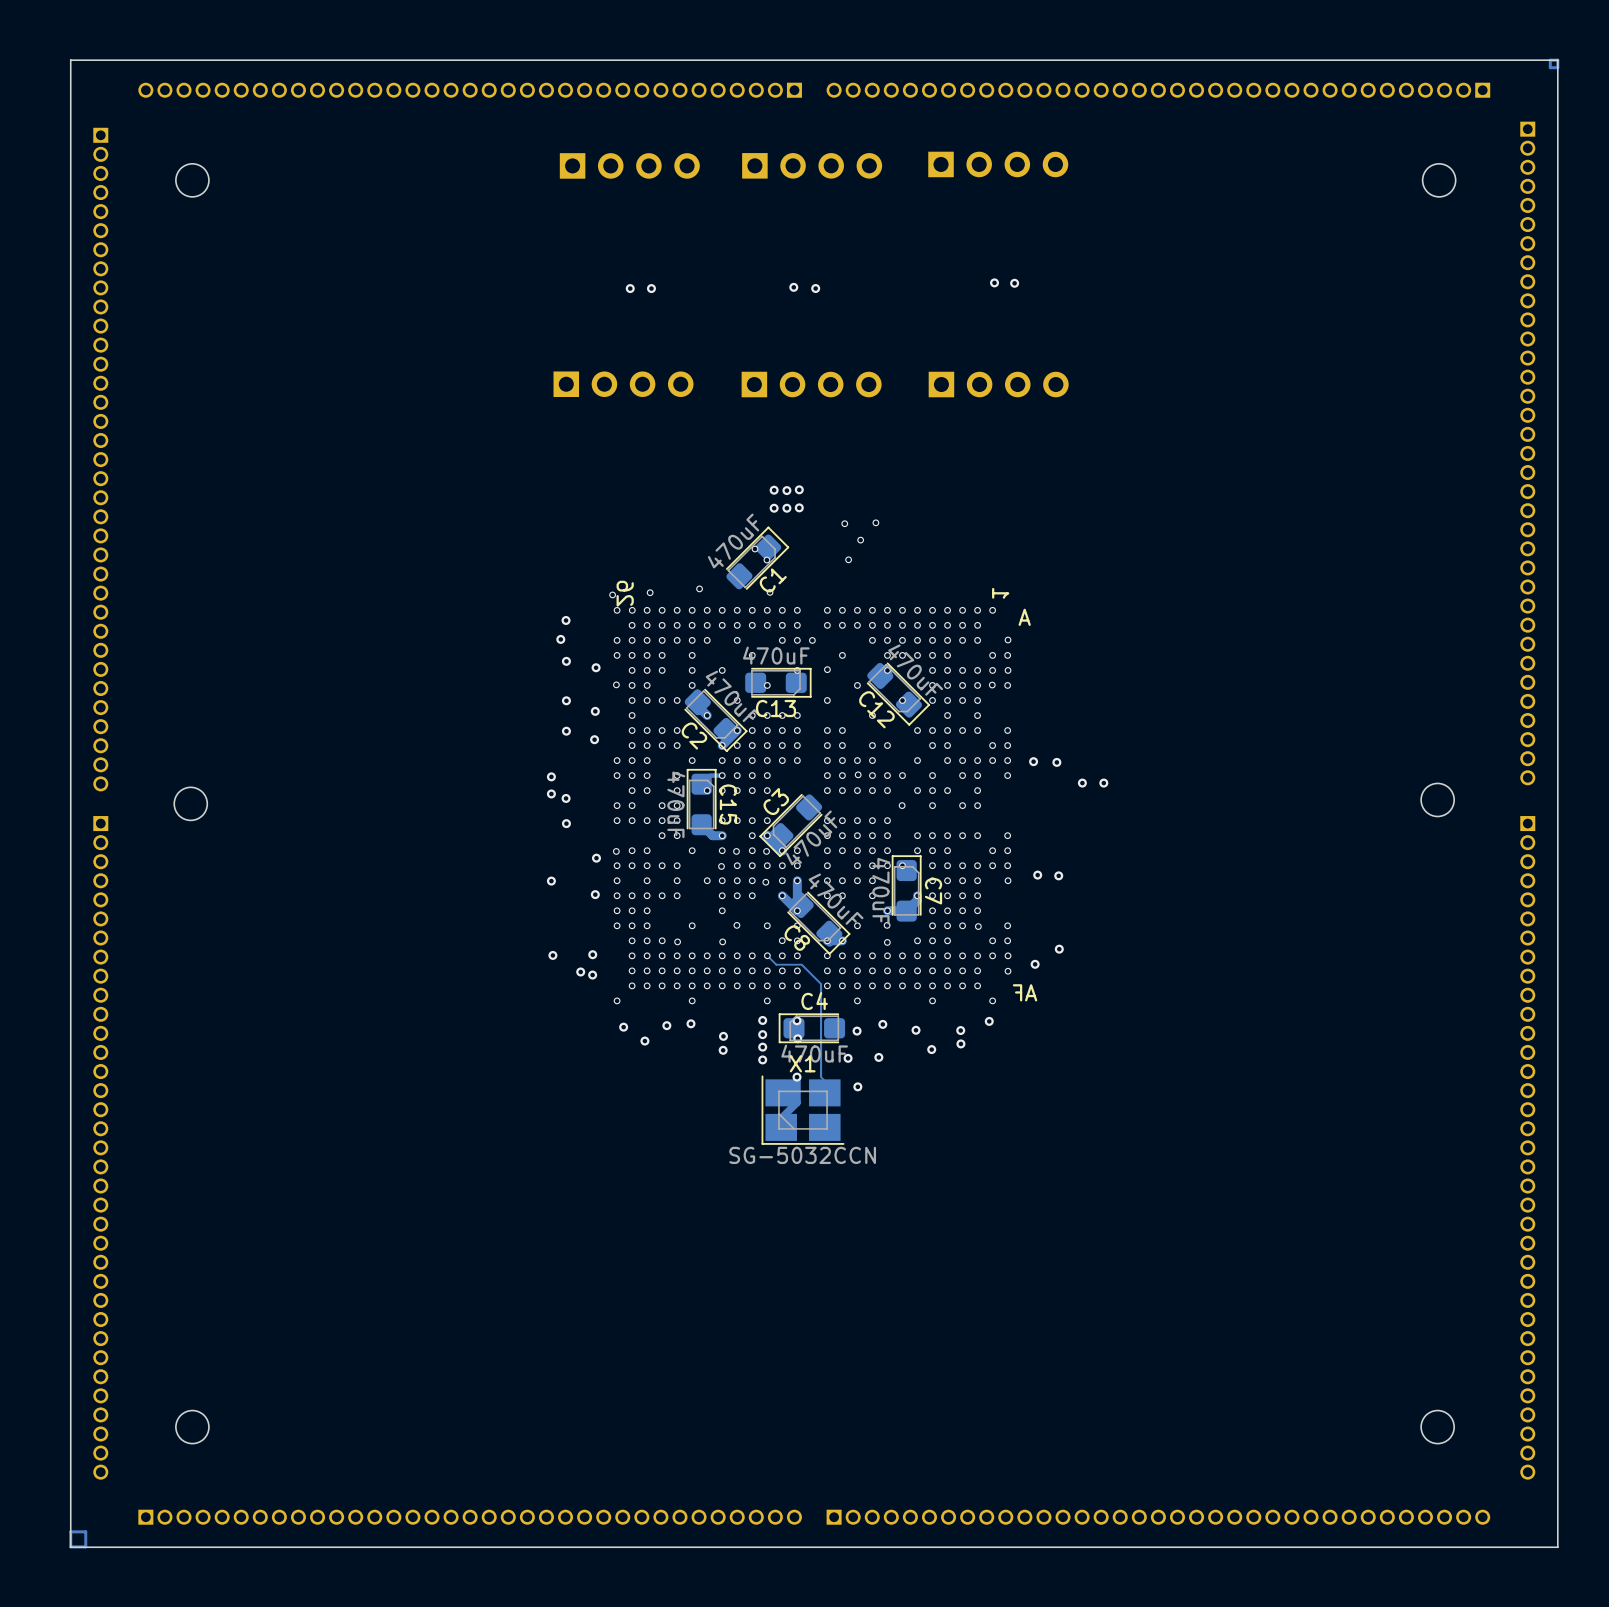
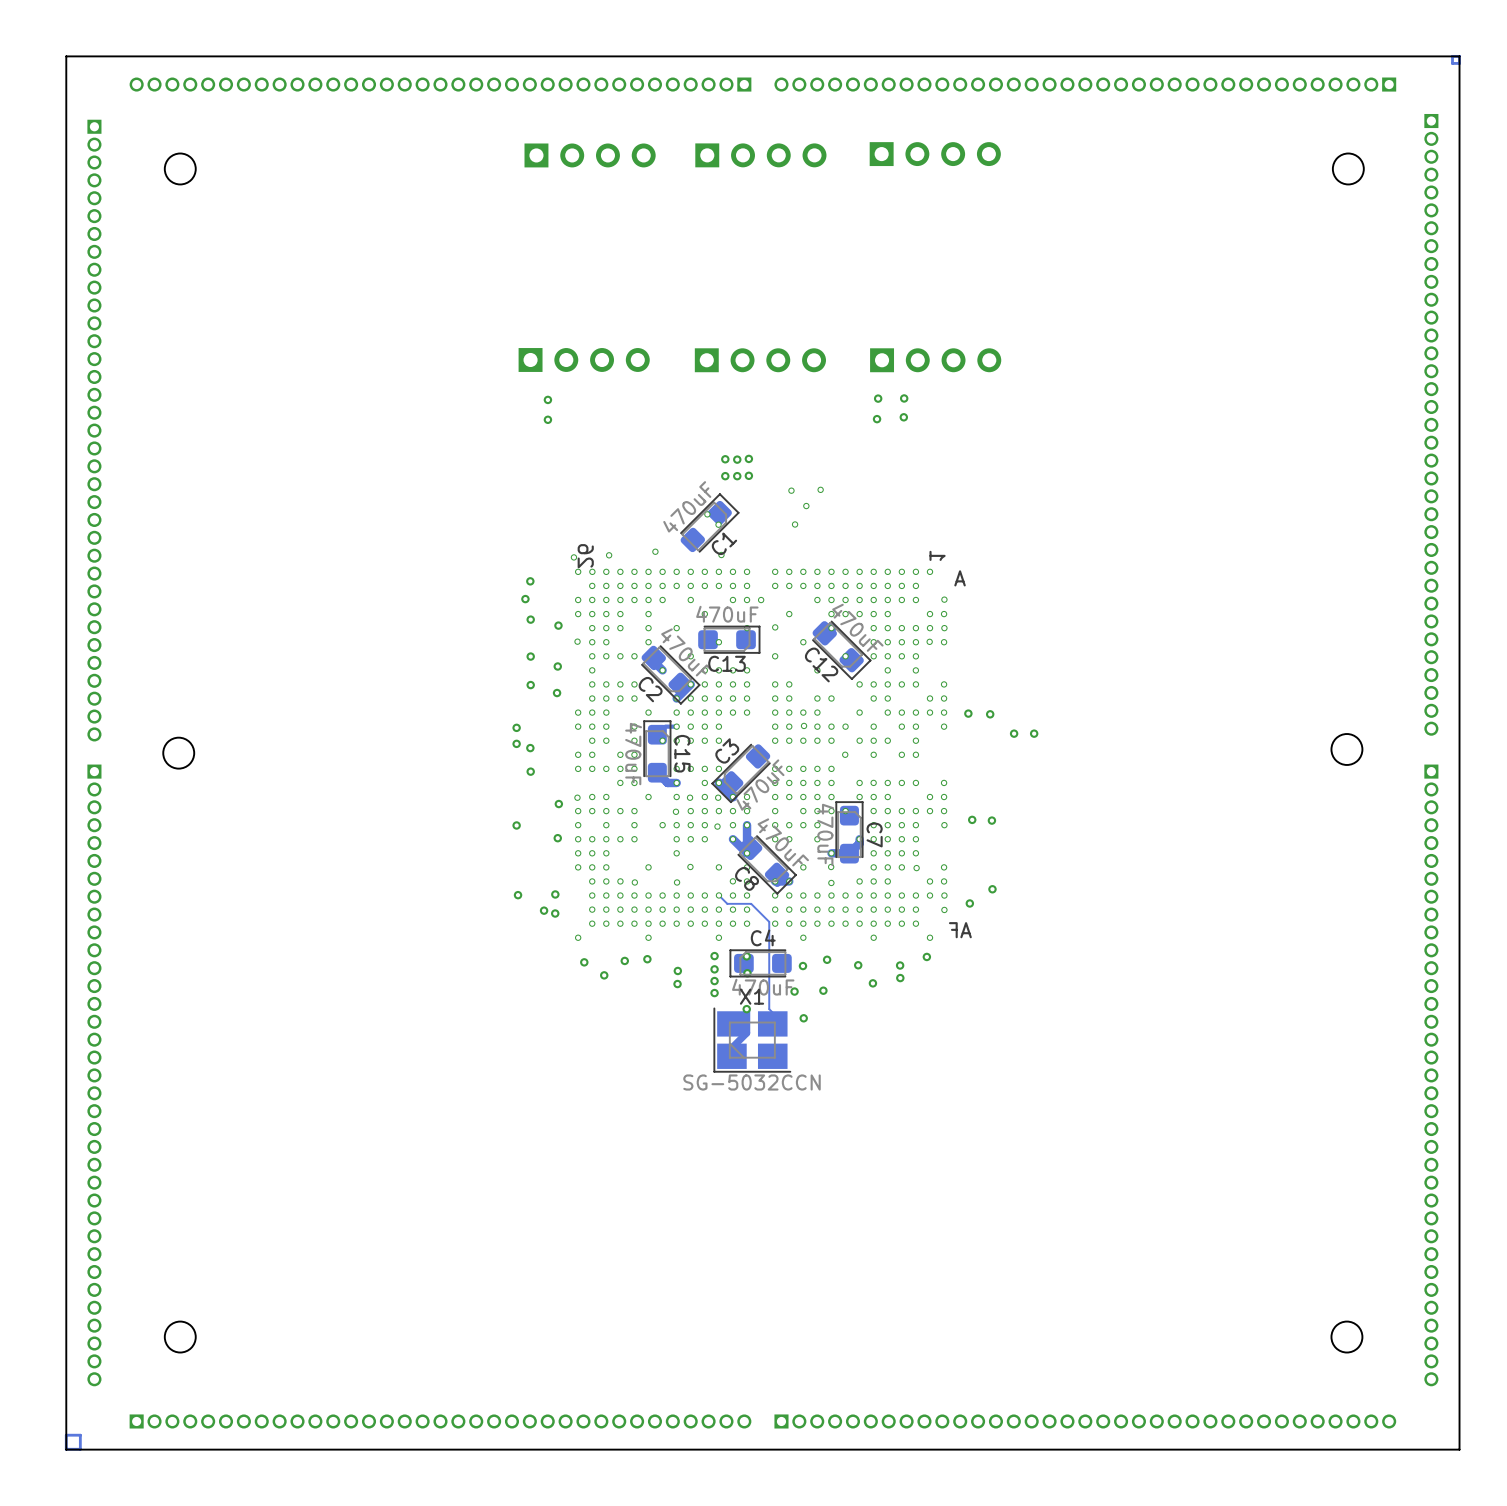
via: (994, 282) -> none
via: (1014, 283) -> none
via: (793, 287) -> none
via: (630, 288) -> none
via: (651, 288) -> none
via: (815, 288) -> none
via: none -> (878, 398)
via: none -> (904, 398)
via: none -> (547, 399)
via: none -> (903, 417)
via: none -> (877, 419)
via: none -> (547, 419)

